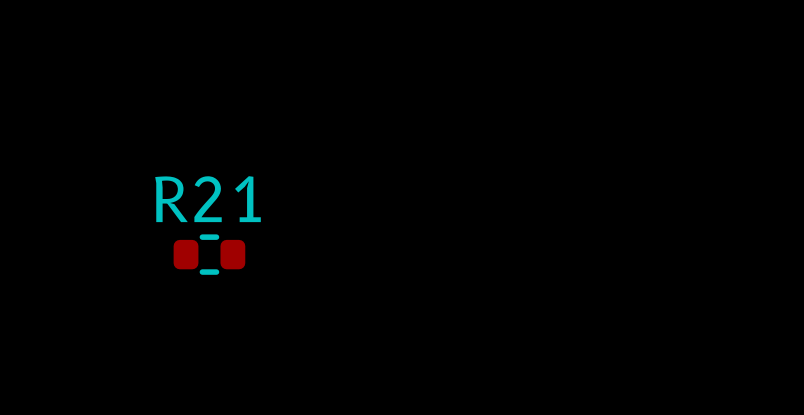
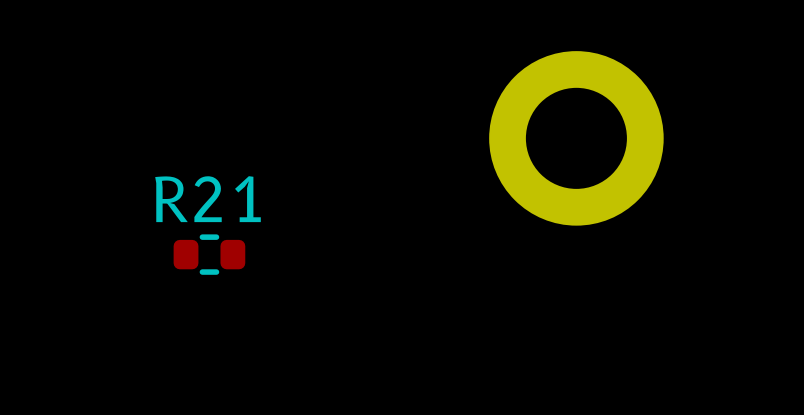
part: none -> (576, 138)

